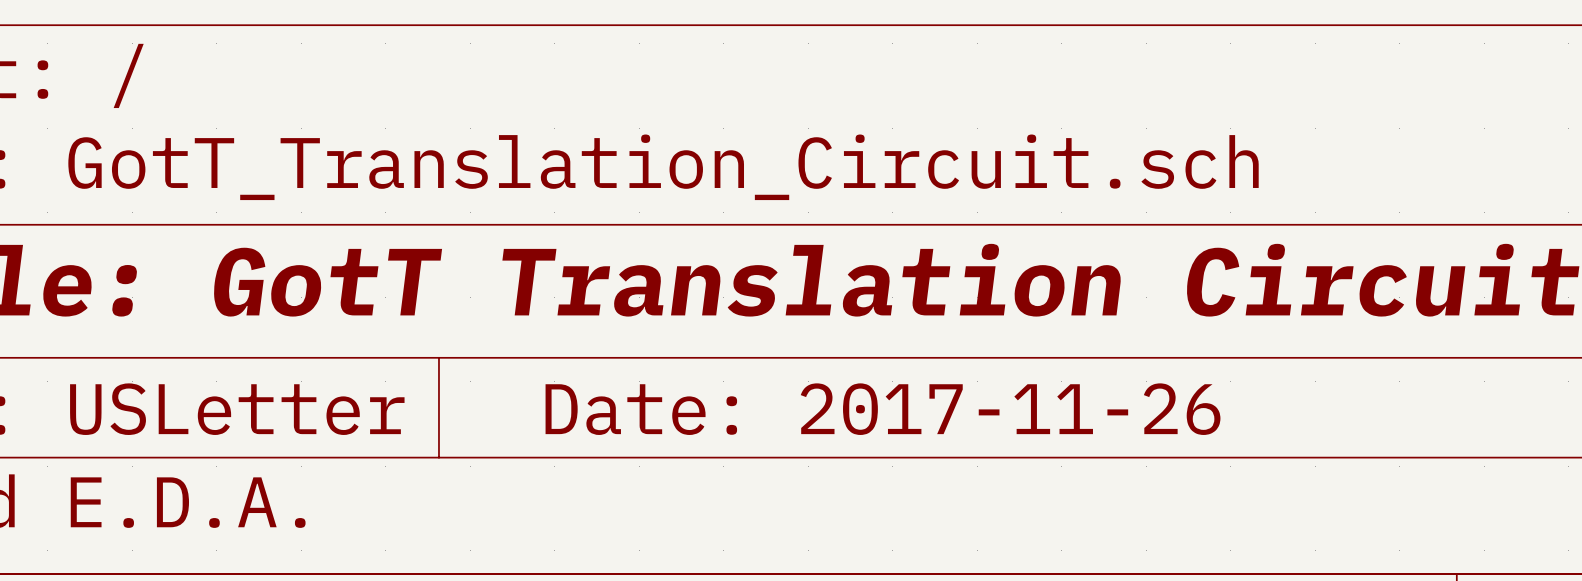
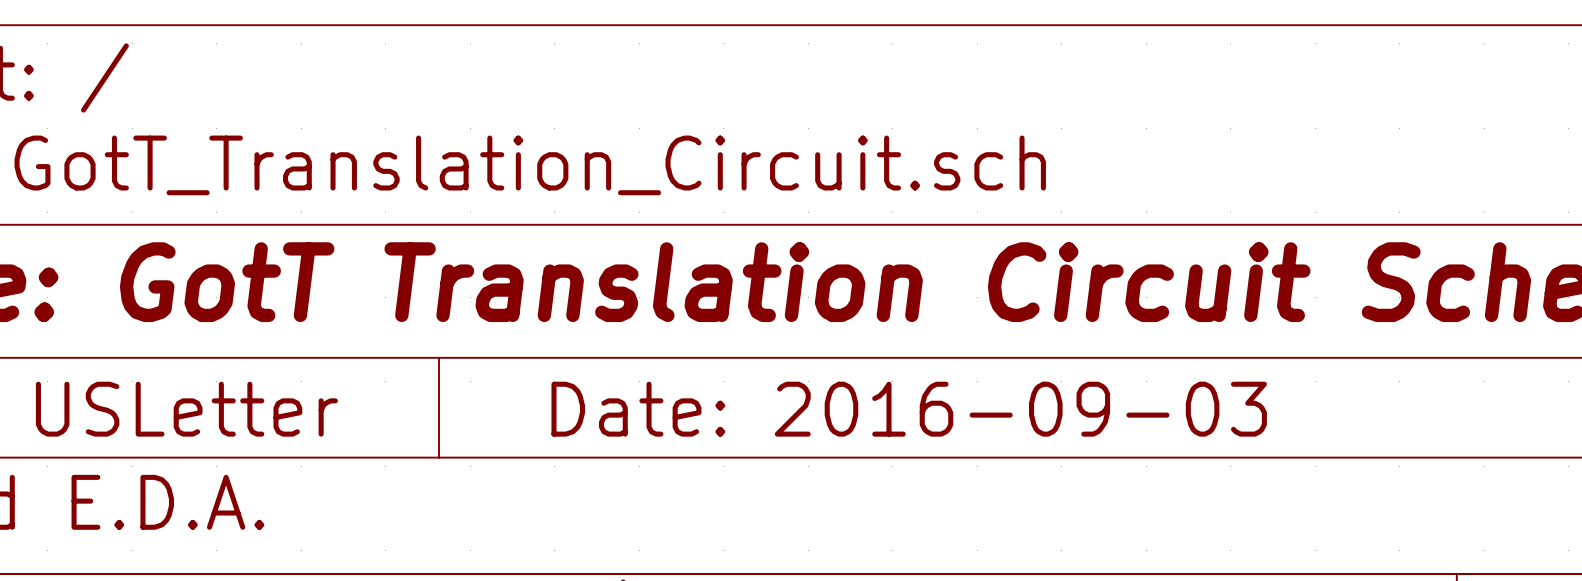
title block: Date: 2017-11-26 (883, 409) -> Date: 2016-09-03 (909, 409)

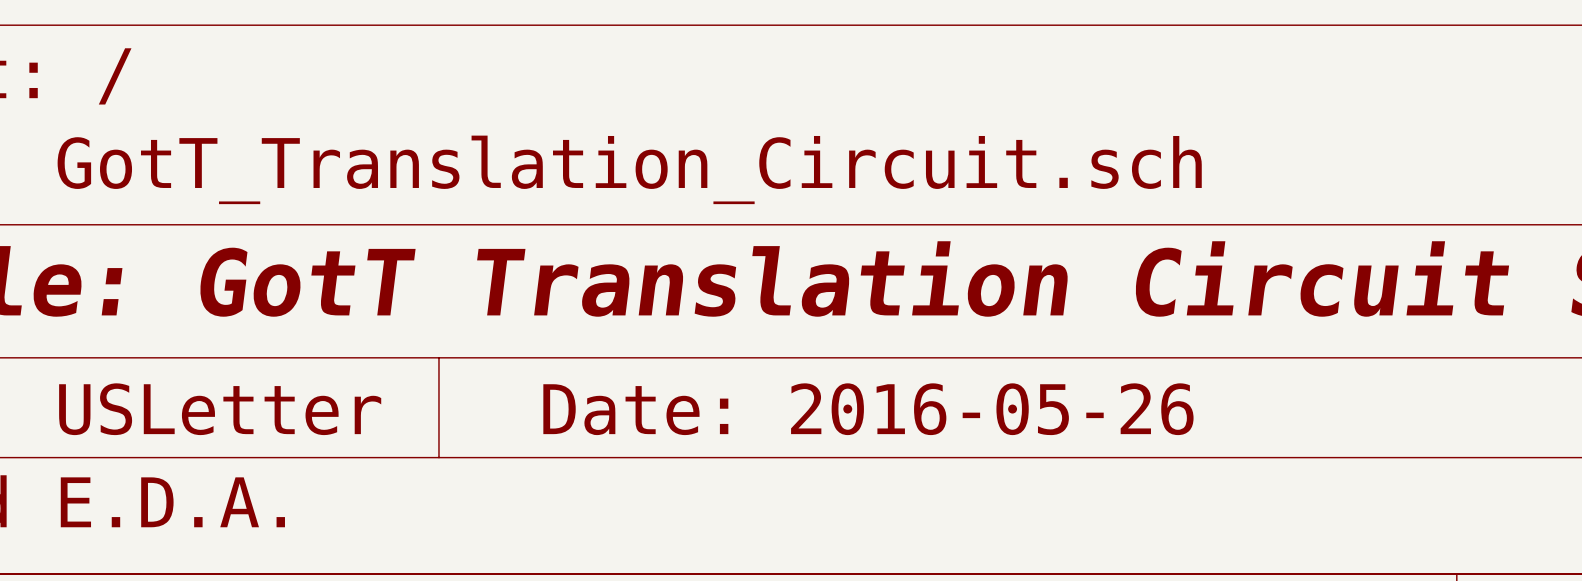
title block: Date: 2016-09-03 (909, 409) -> Date: 2016-05-26 (868, 409)

